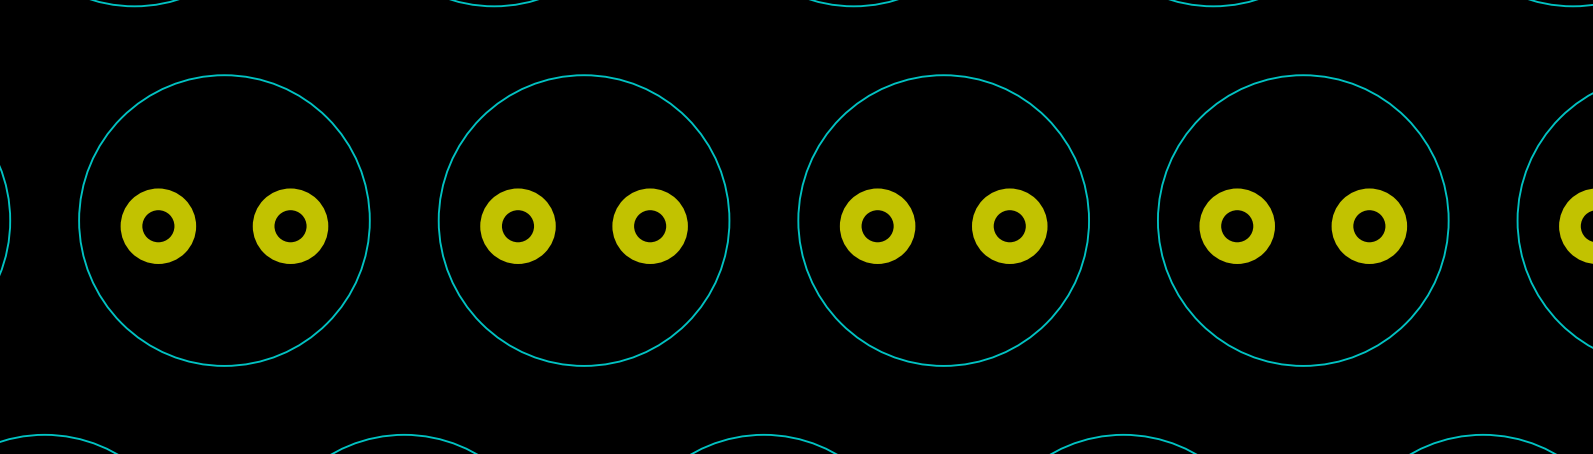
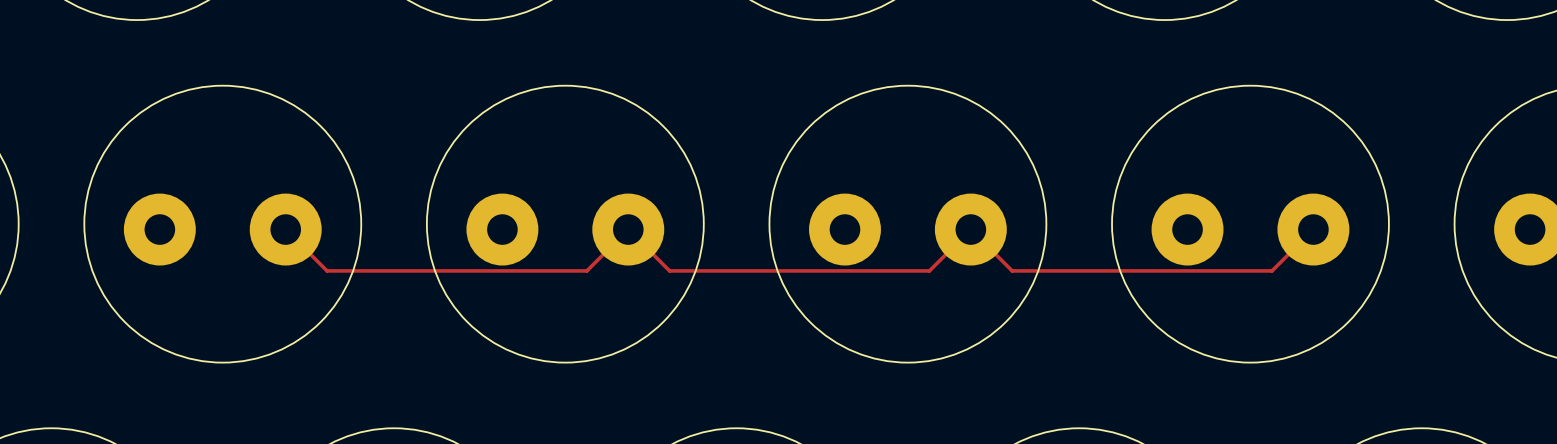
track: none -> (285, 229) (327, 270) (586, 270) (628, 229) (669, 270) (929, 270) (970, 229) (1012, 270) (1272, 270) (1313, 229)

